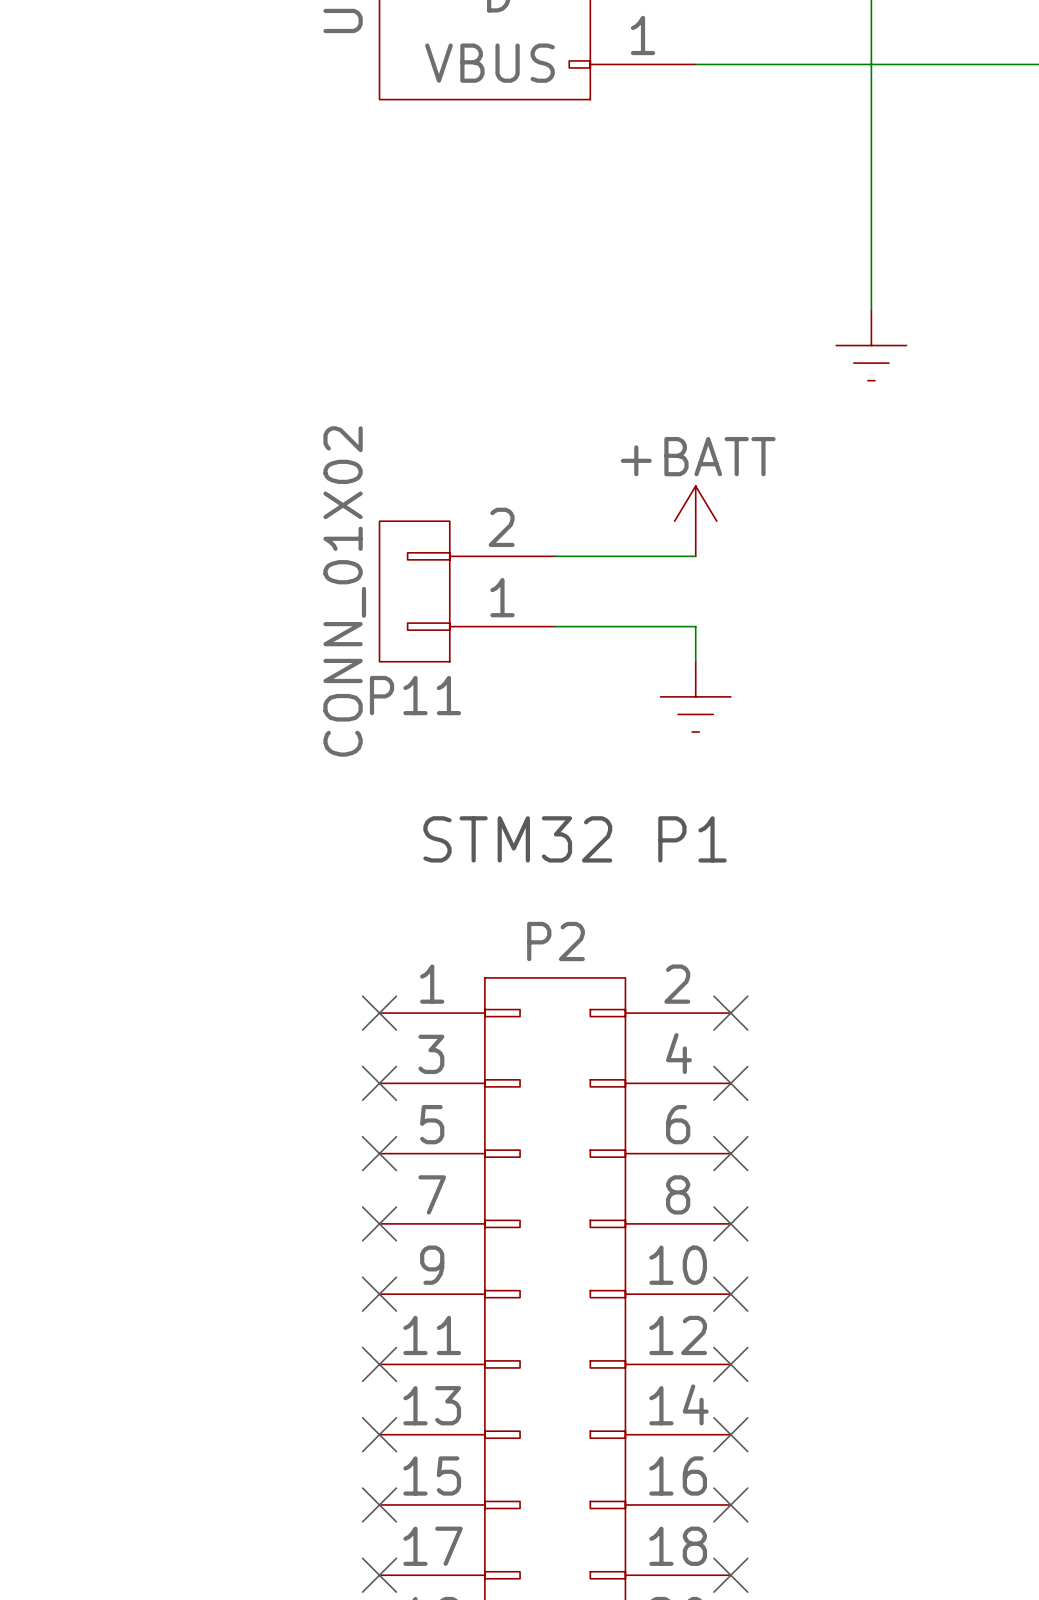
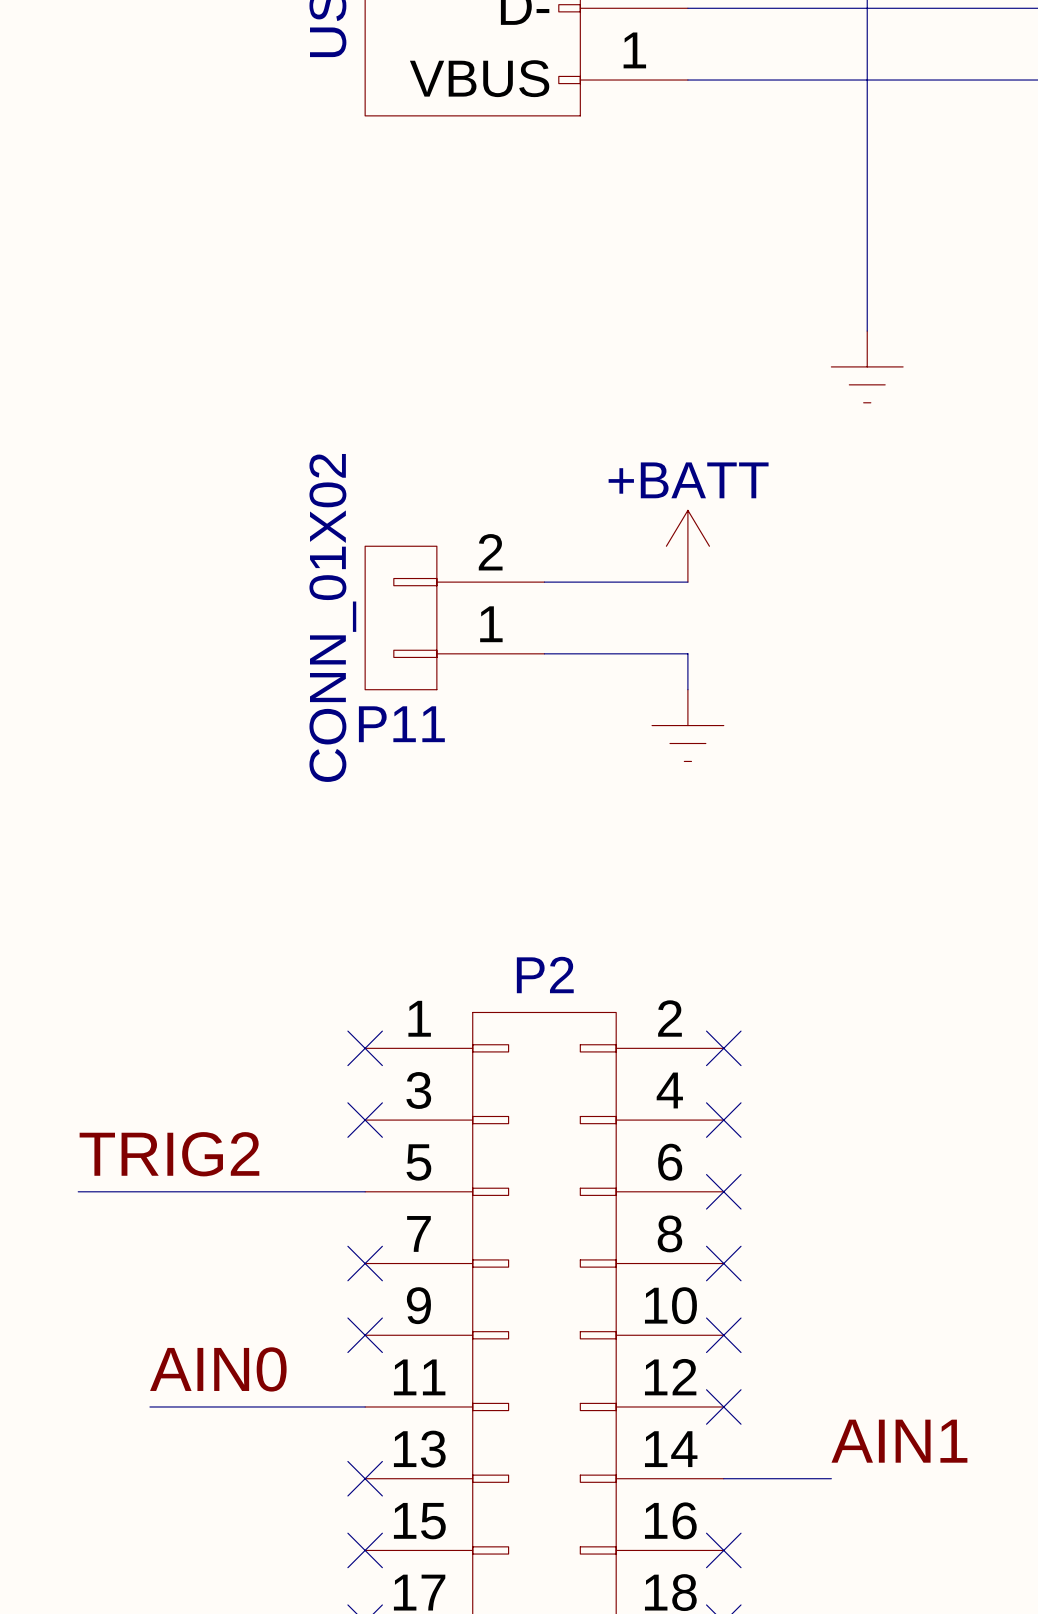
text: STM32 P1 (575, 839) -> none
label: none -> TRIG2 (169, 1154)
wire: none -> (78, 1191) (365, 1191)
no-connect mark: (379, 1153) -> none
label: none -> AIN0 (218, 1369)
wire: none -> (149, 1406) (365, 1406)
no-connect mark: (379, 1364) -> none
label: none -> AIN1 (899, 1441)
wire: none -> (723, 1478) (831, 1478)
no-connect mark: (730, 1434) -> none

